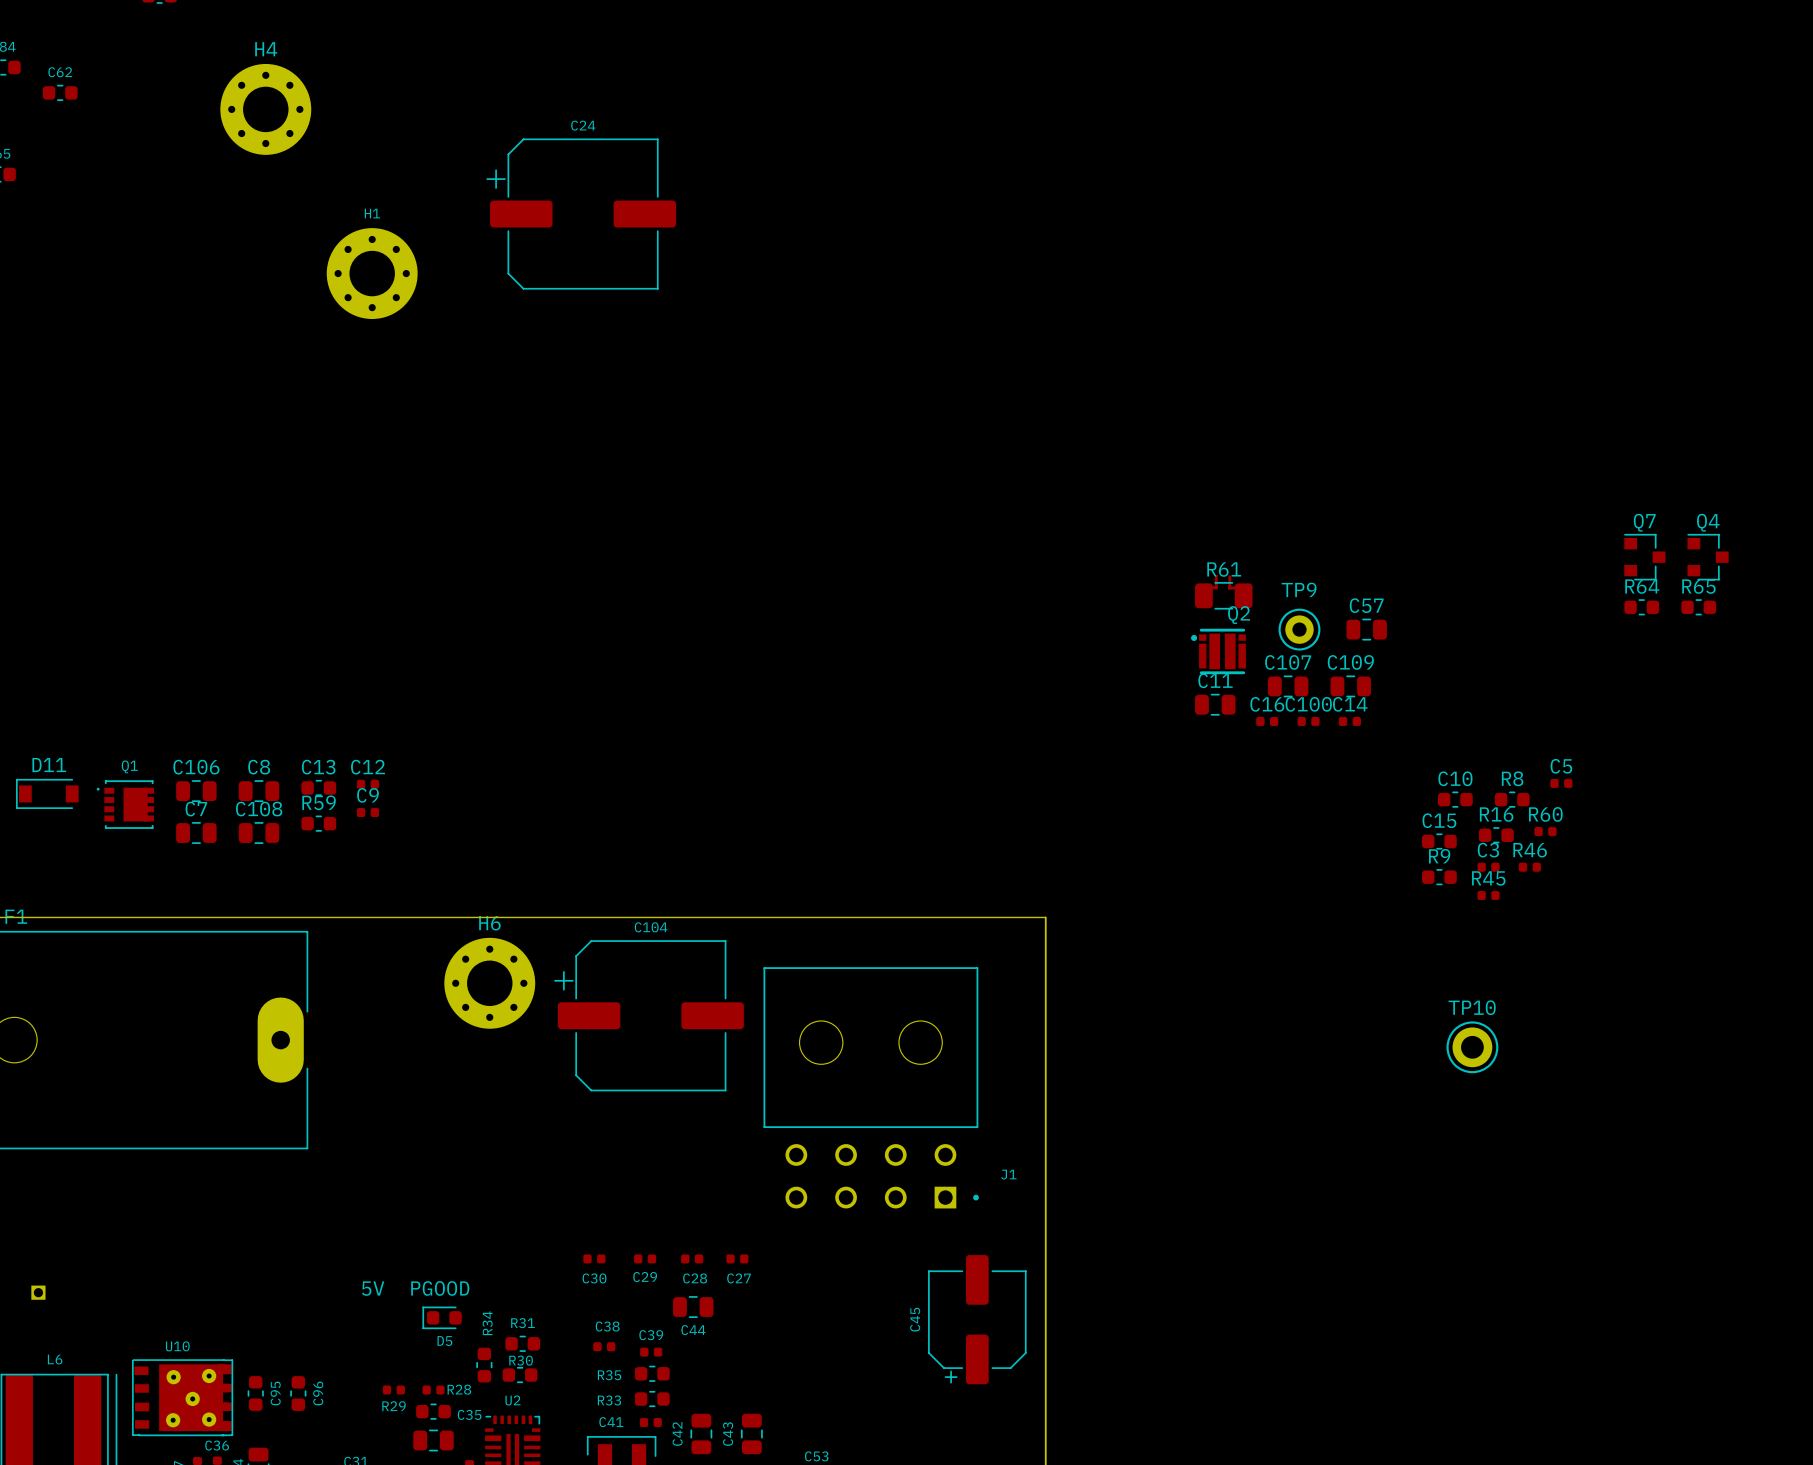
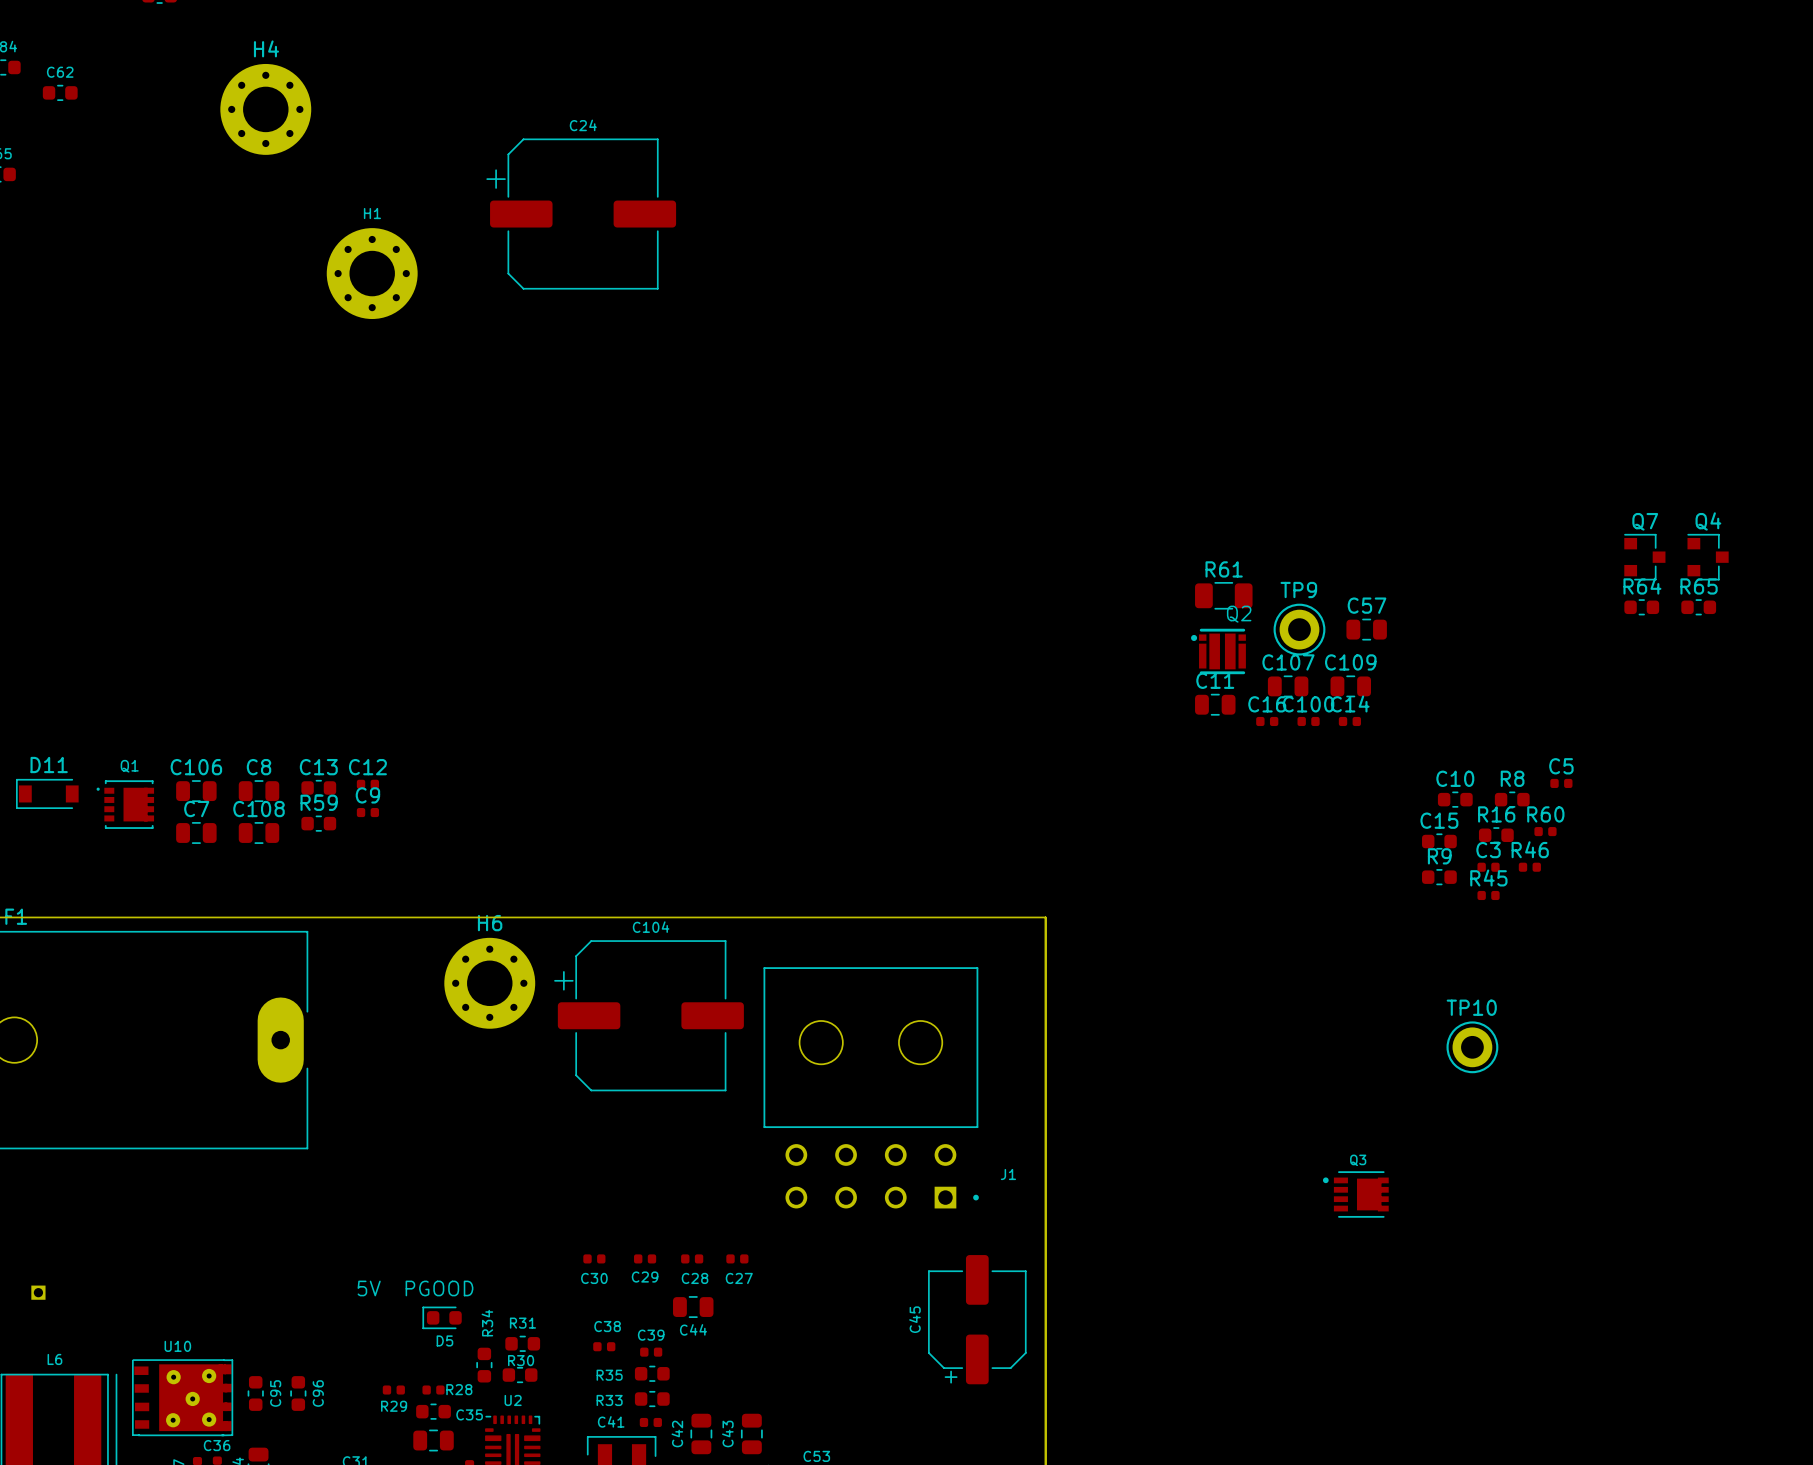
R61 footprint: [1195, 575, 1253, 610] -> [1195, 582, 1253, 610]
TP9 footprint: [1278, 608, 1321, 651] -> [1273, 603, 1326, 656]
Q3: none -> (1355, 1194)

